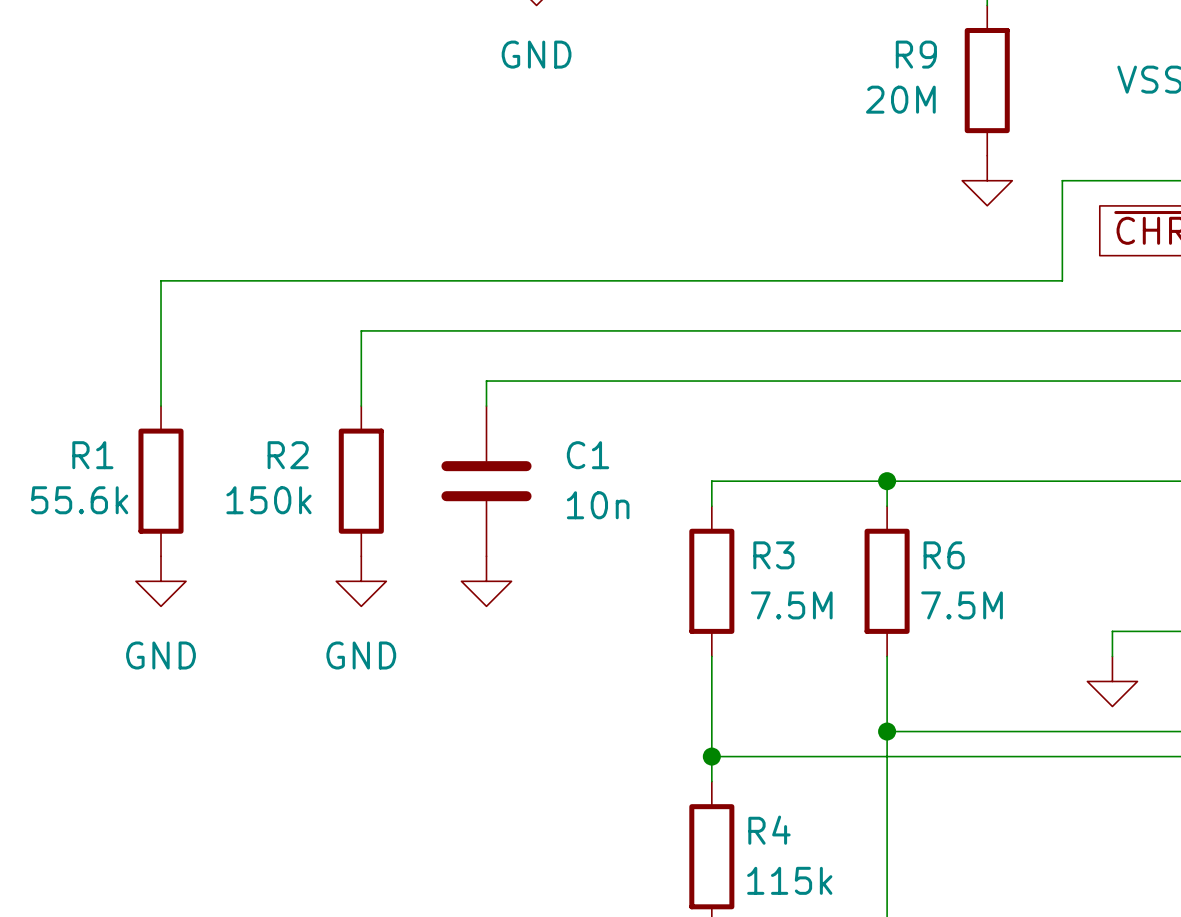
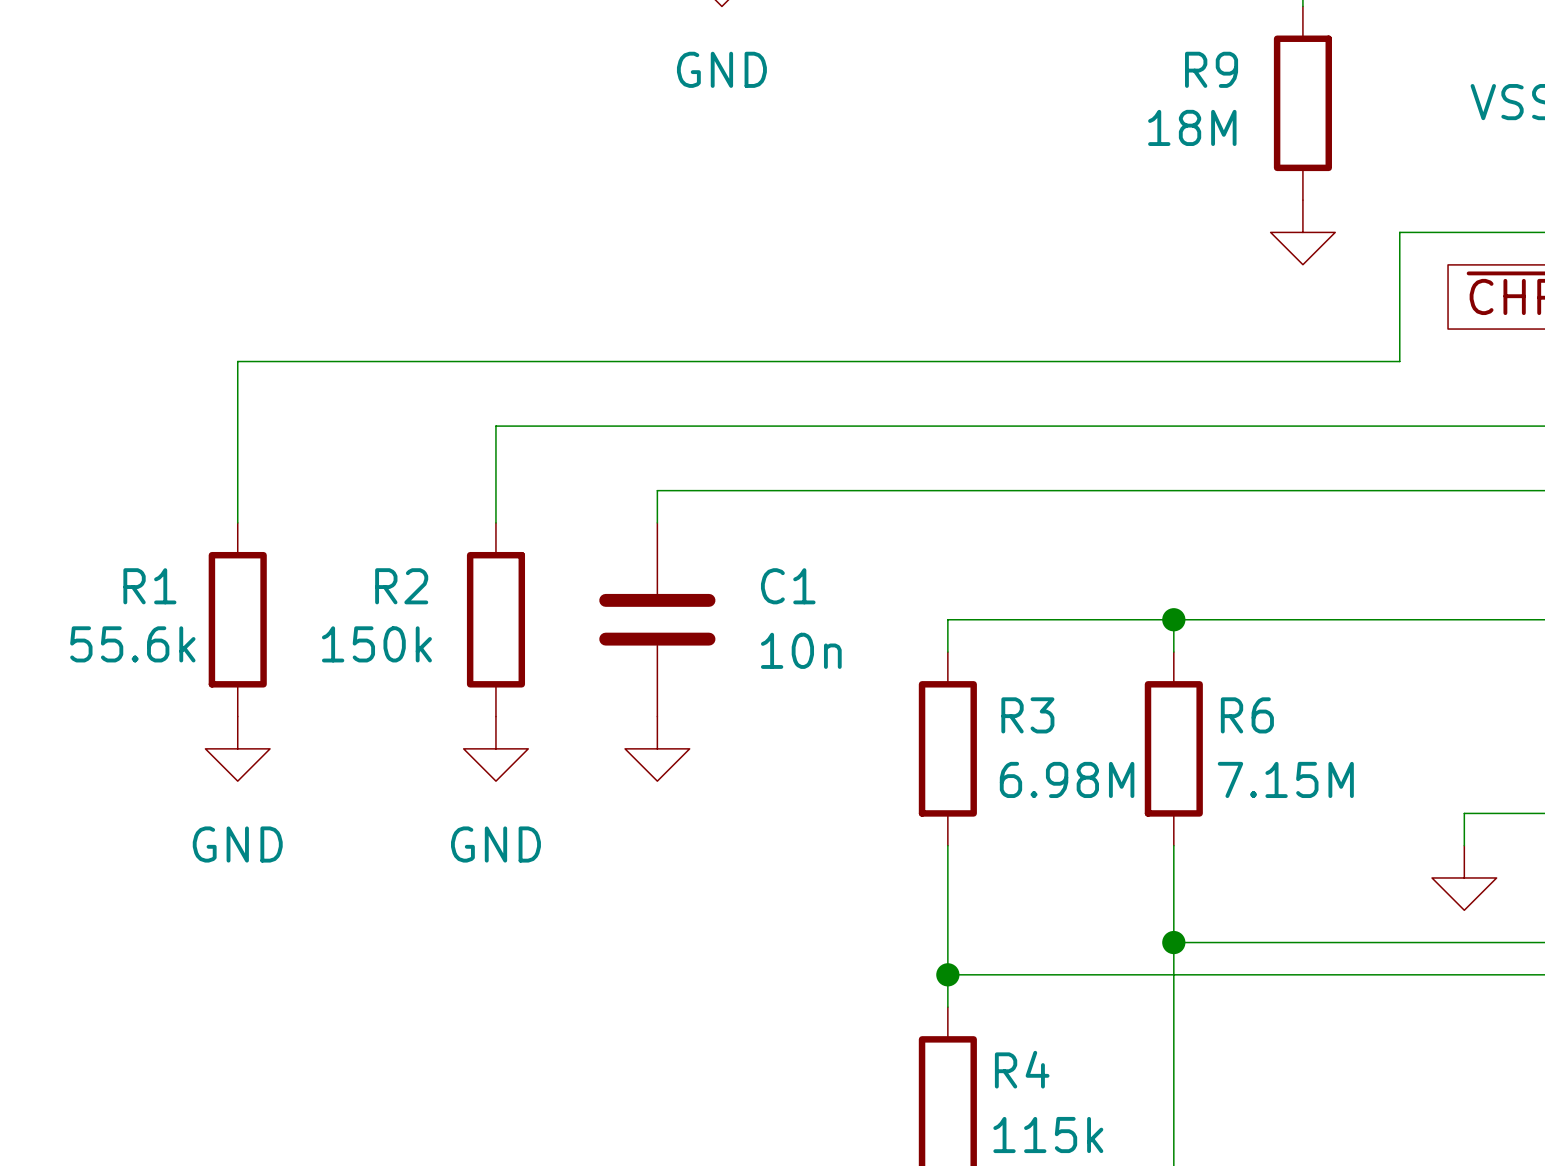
R9 value: 20M (900, 99) -> 18M (1192, 127)
R3 value: 7.5M (791, 605) -> 6.98M (1067, 779)
R6 value: 7.5M (962, 605) -> 7.15M (1285, 779)

